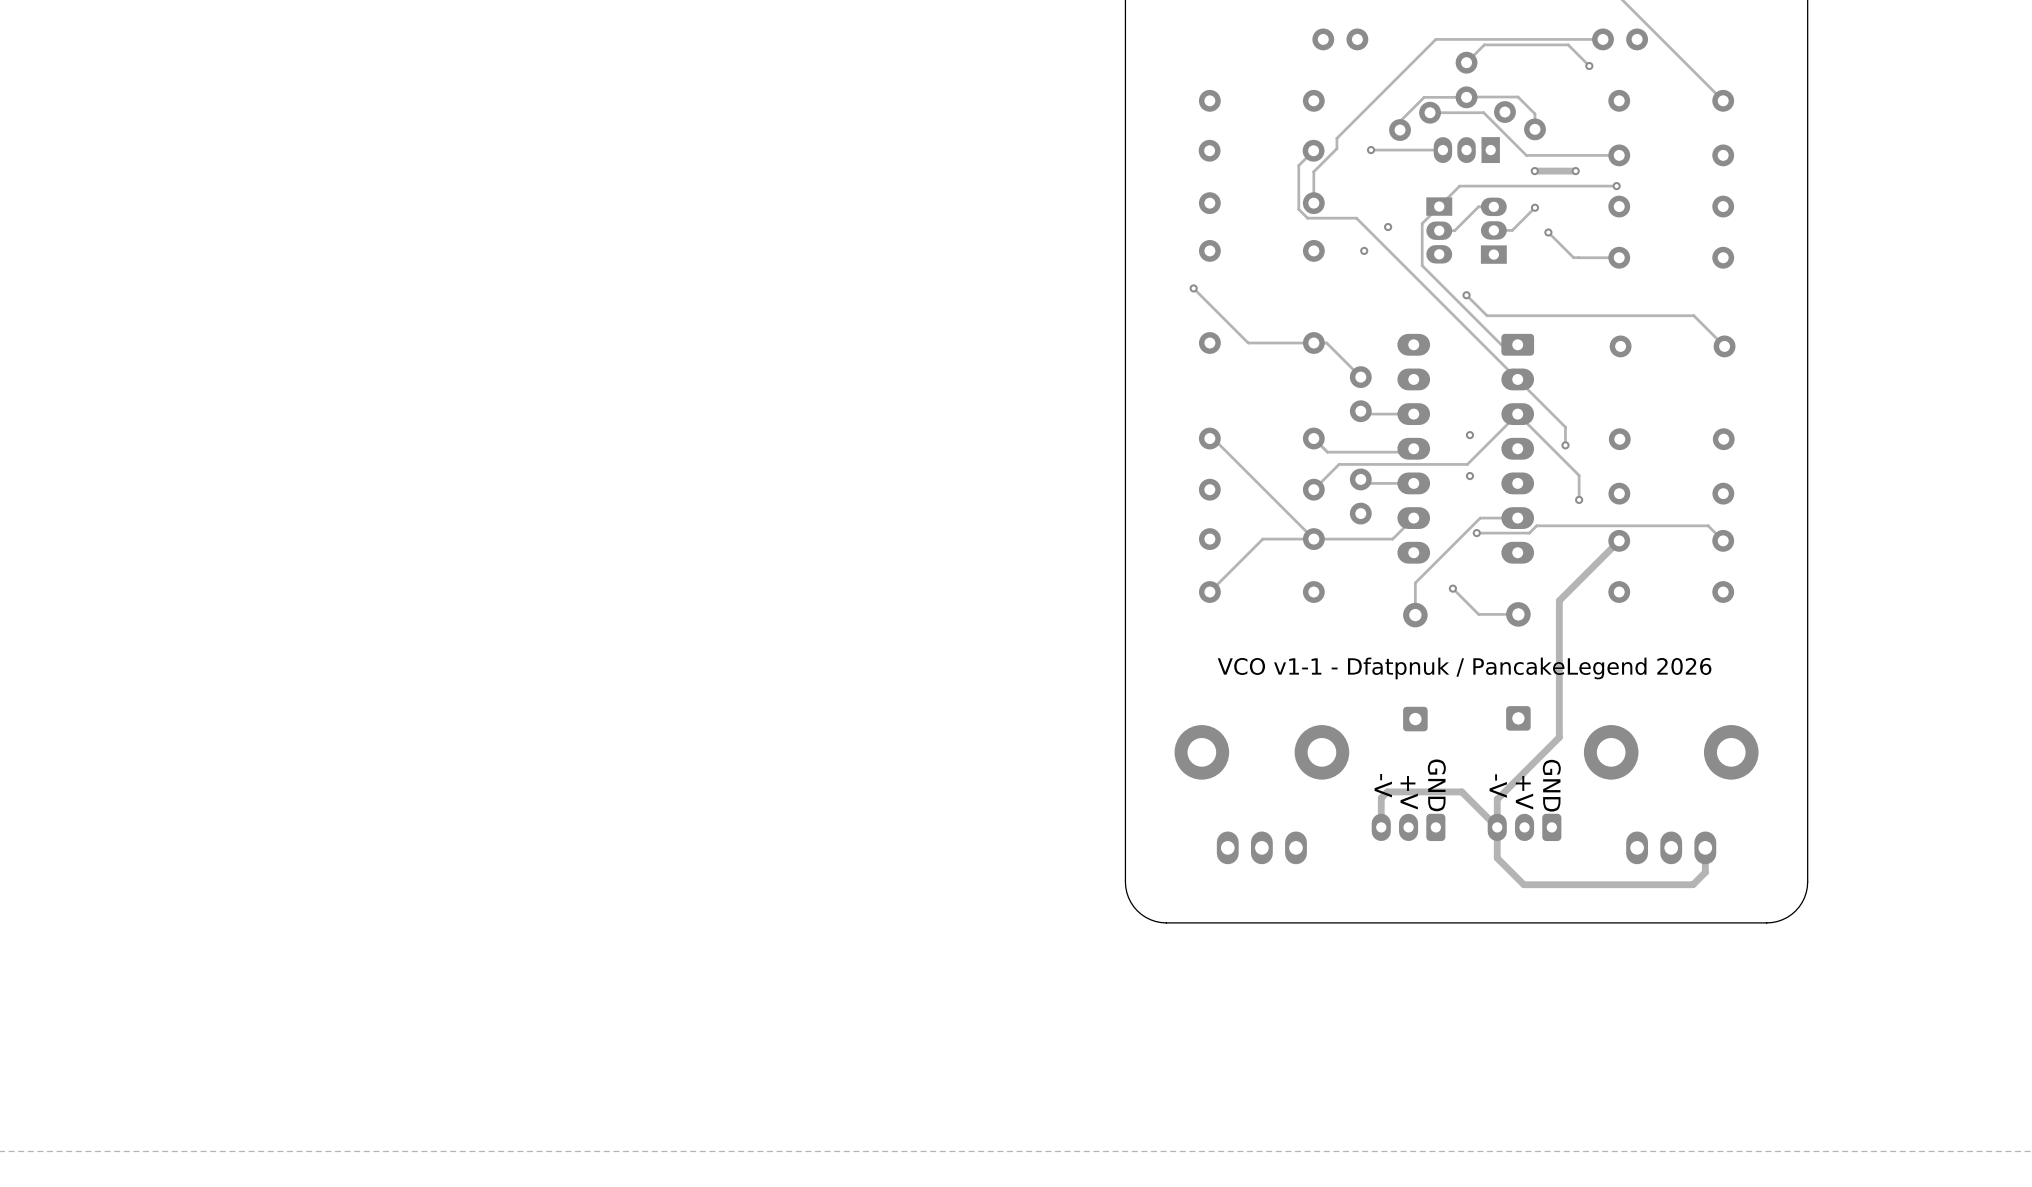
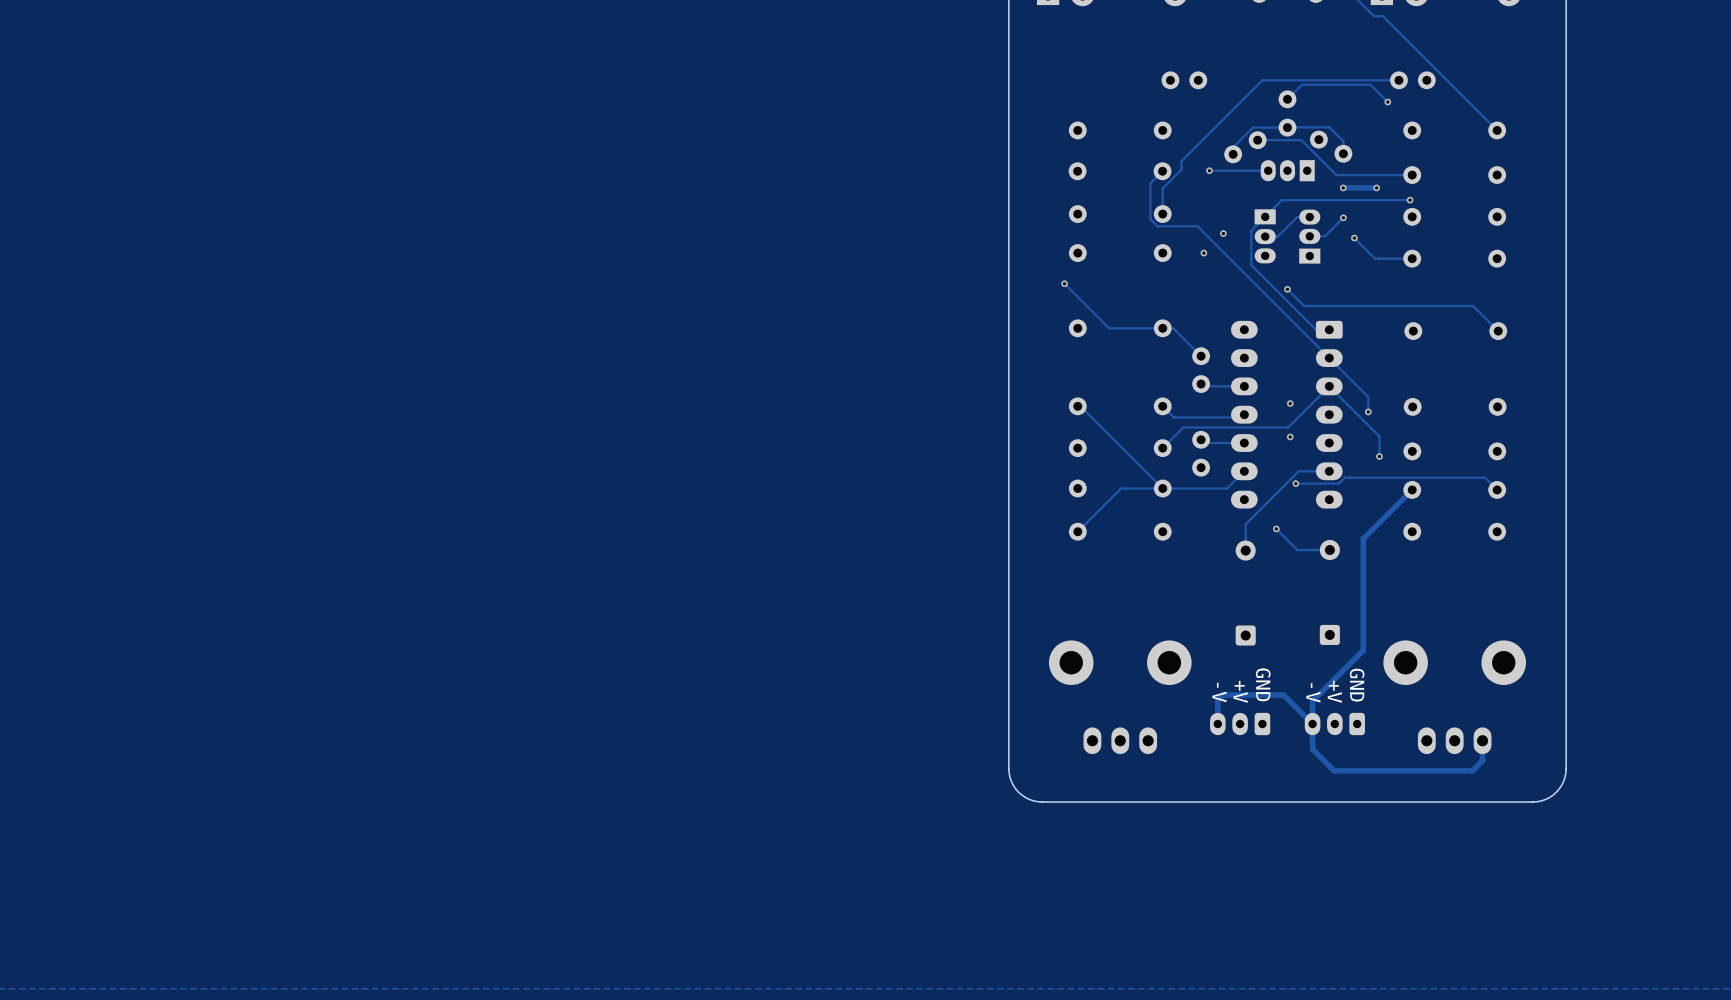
text: VCO v1-1 - Dfatpnuk / PancakeLegend 2026 (1464, 668) -> none

